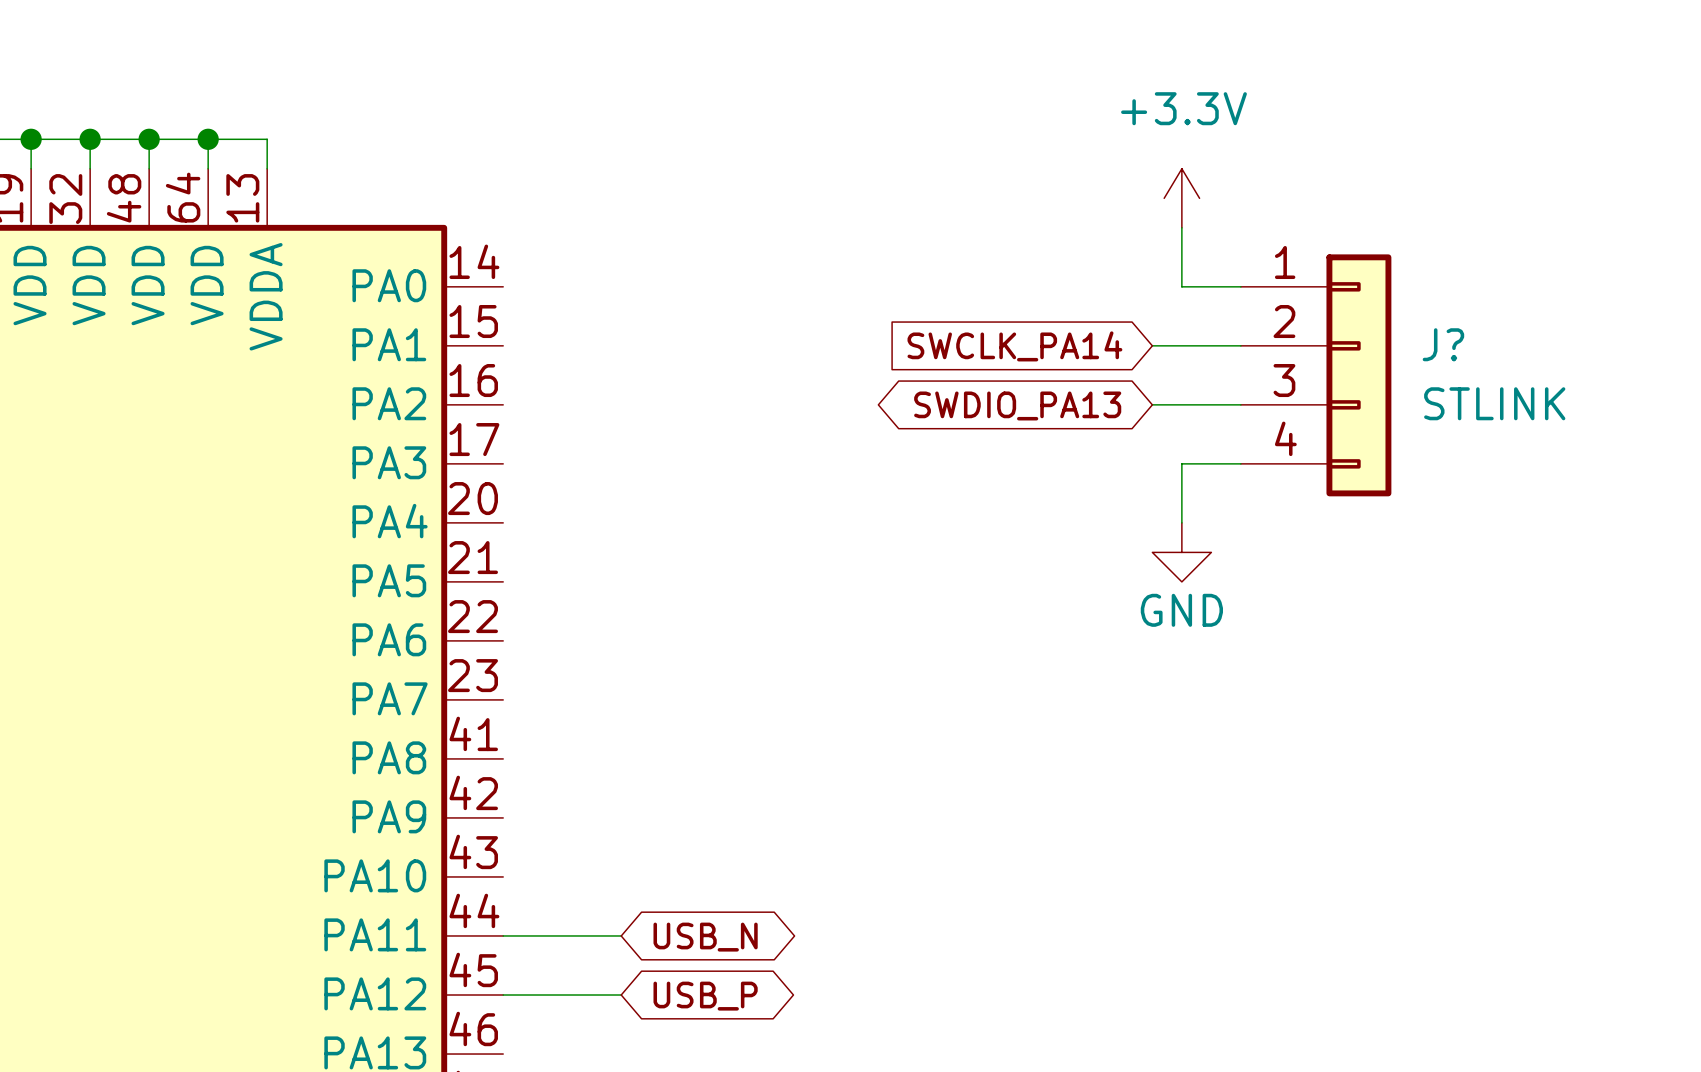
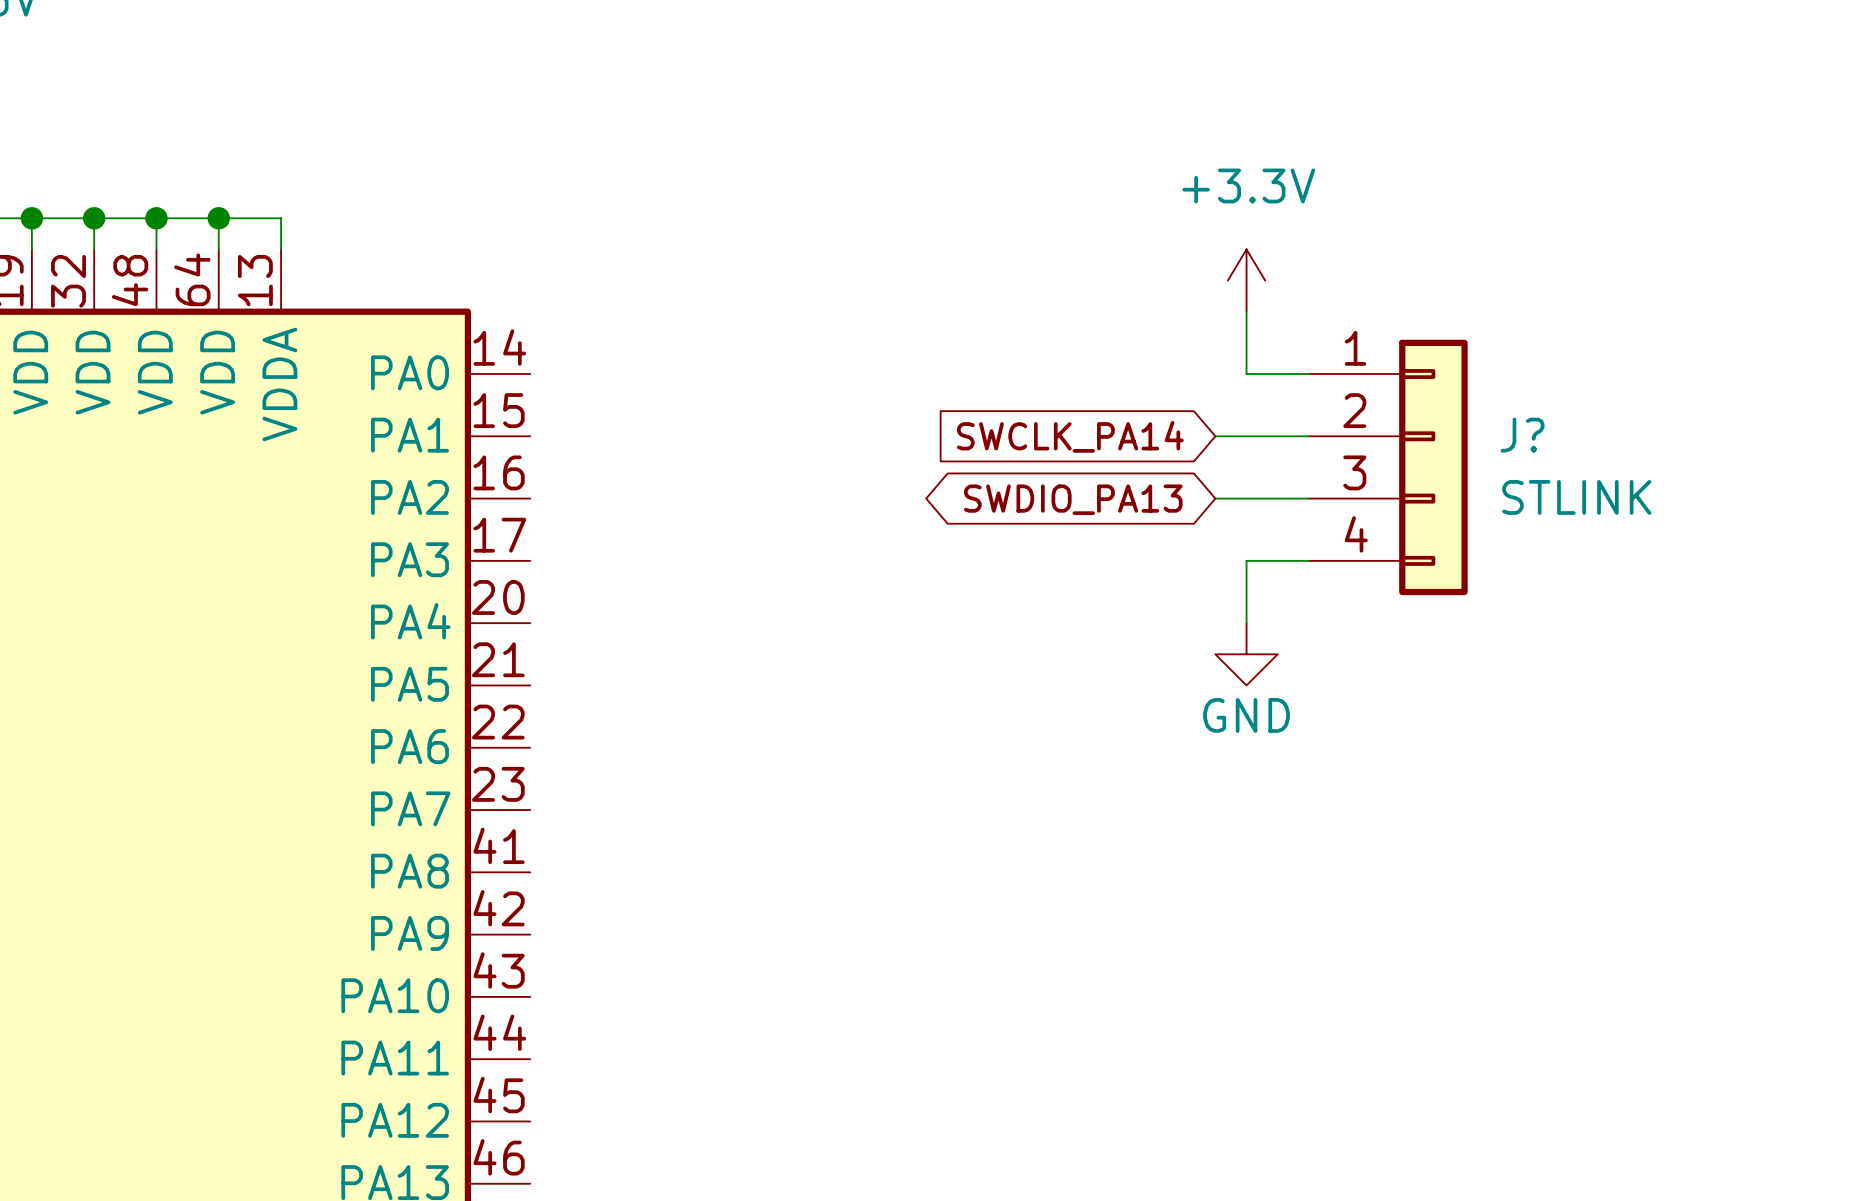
wire: (503, 935) (621, 935) -> none
global label: USB_N (705, 937) -> none
wire: (503, 995) (621, 995) -> none
global label: USB_P (705, 996) -> none

